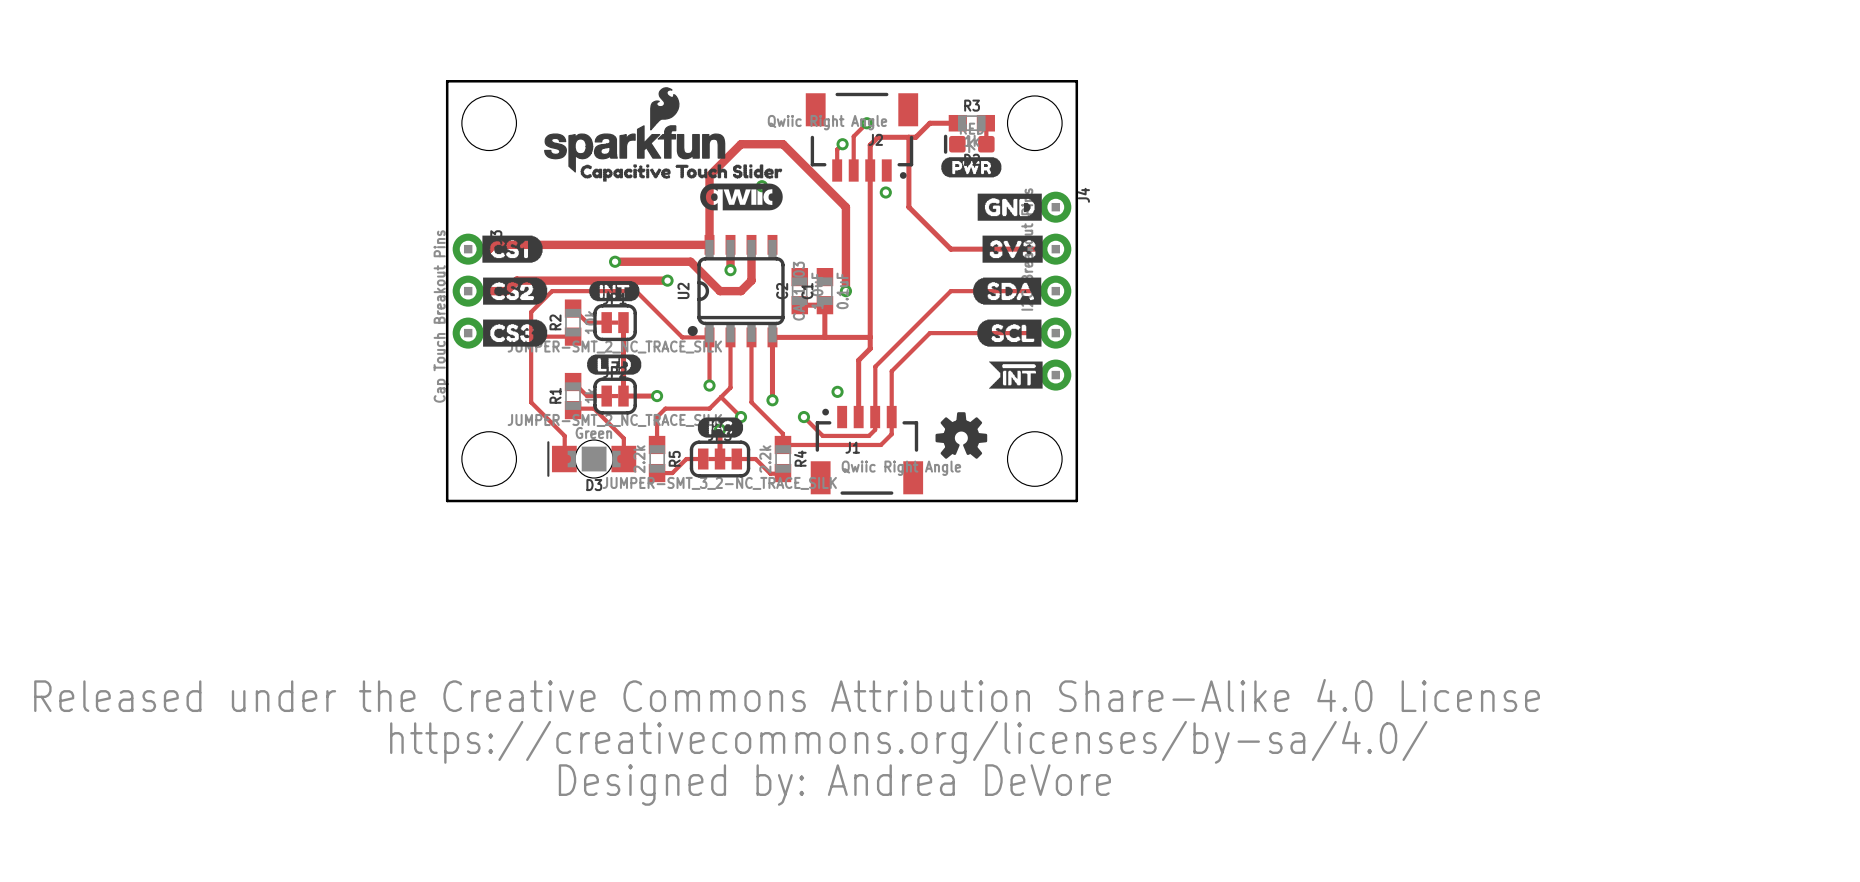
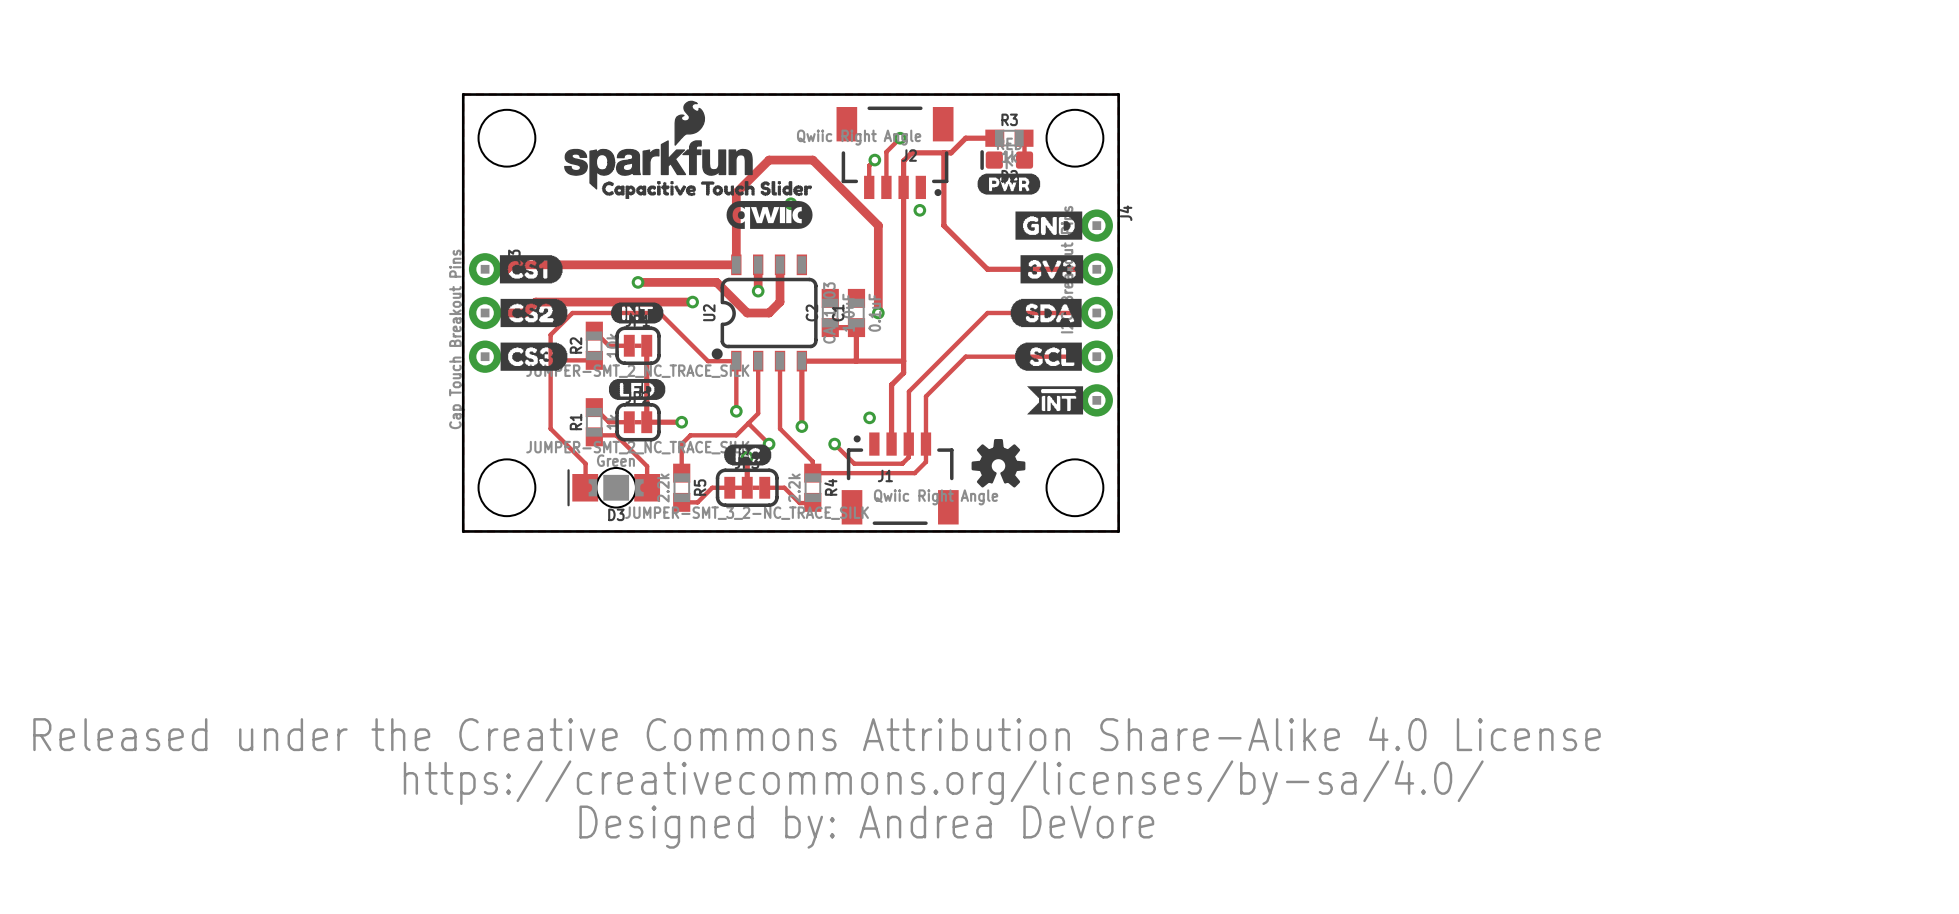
U2 footprint: [687, 234, 785, 348] -> [711, 254, 818, 372]

